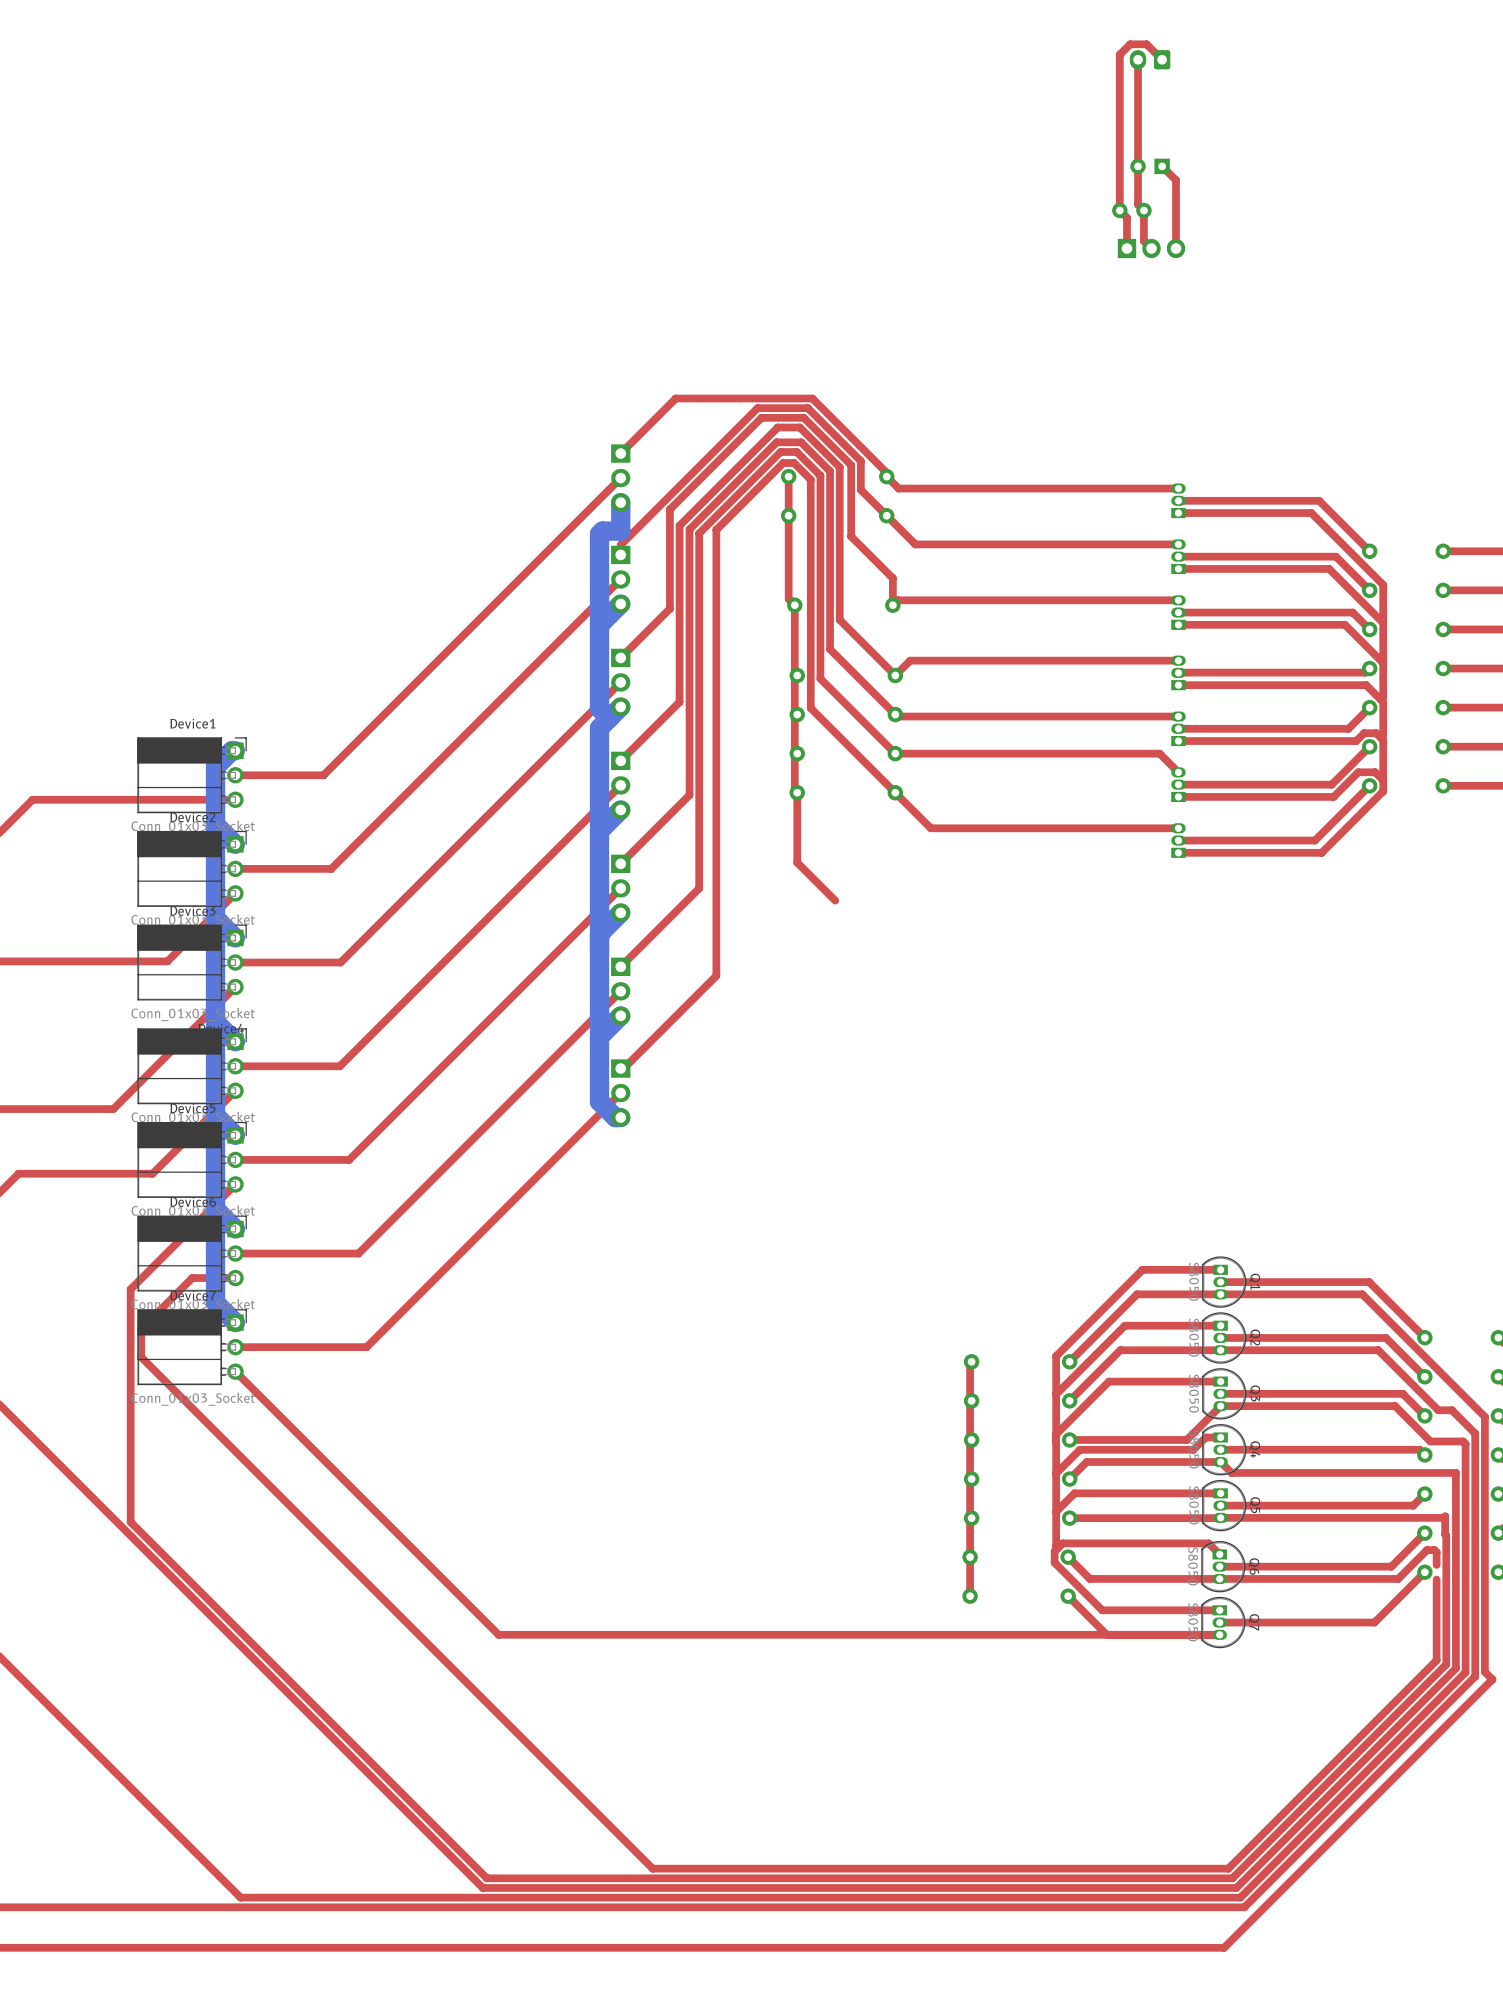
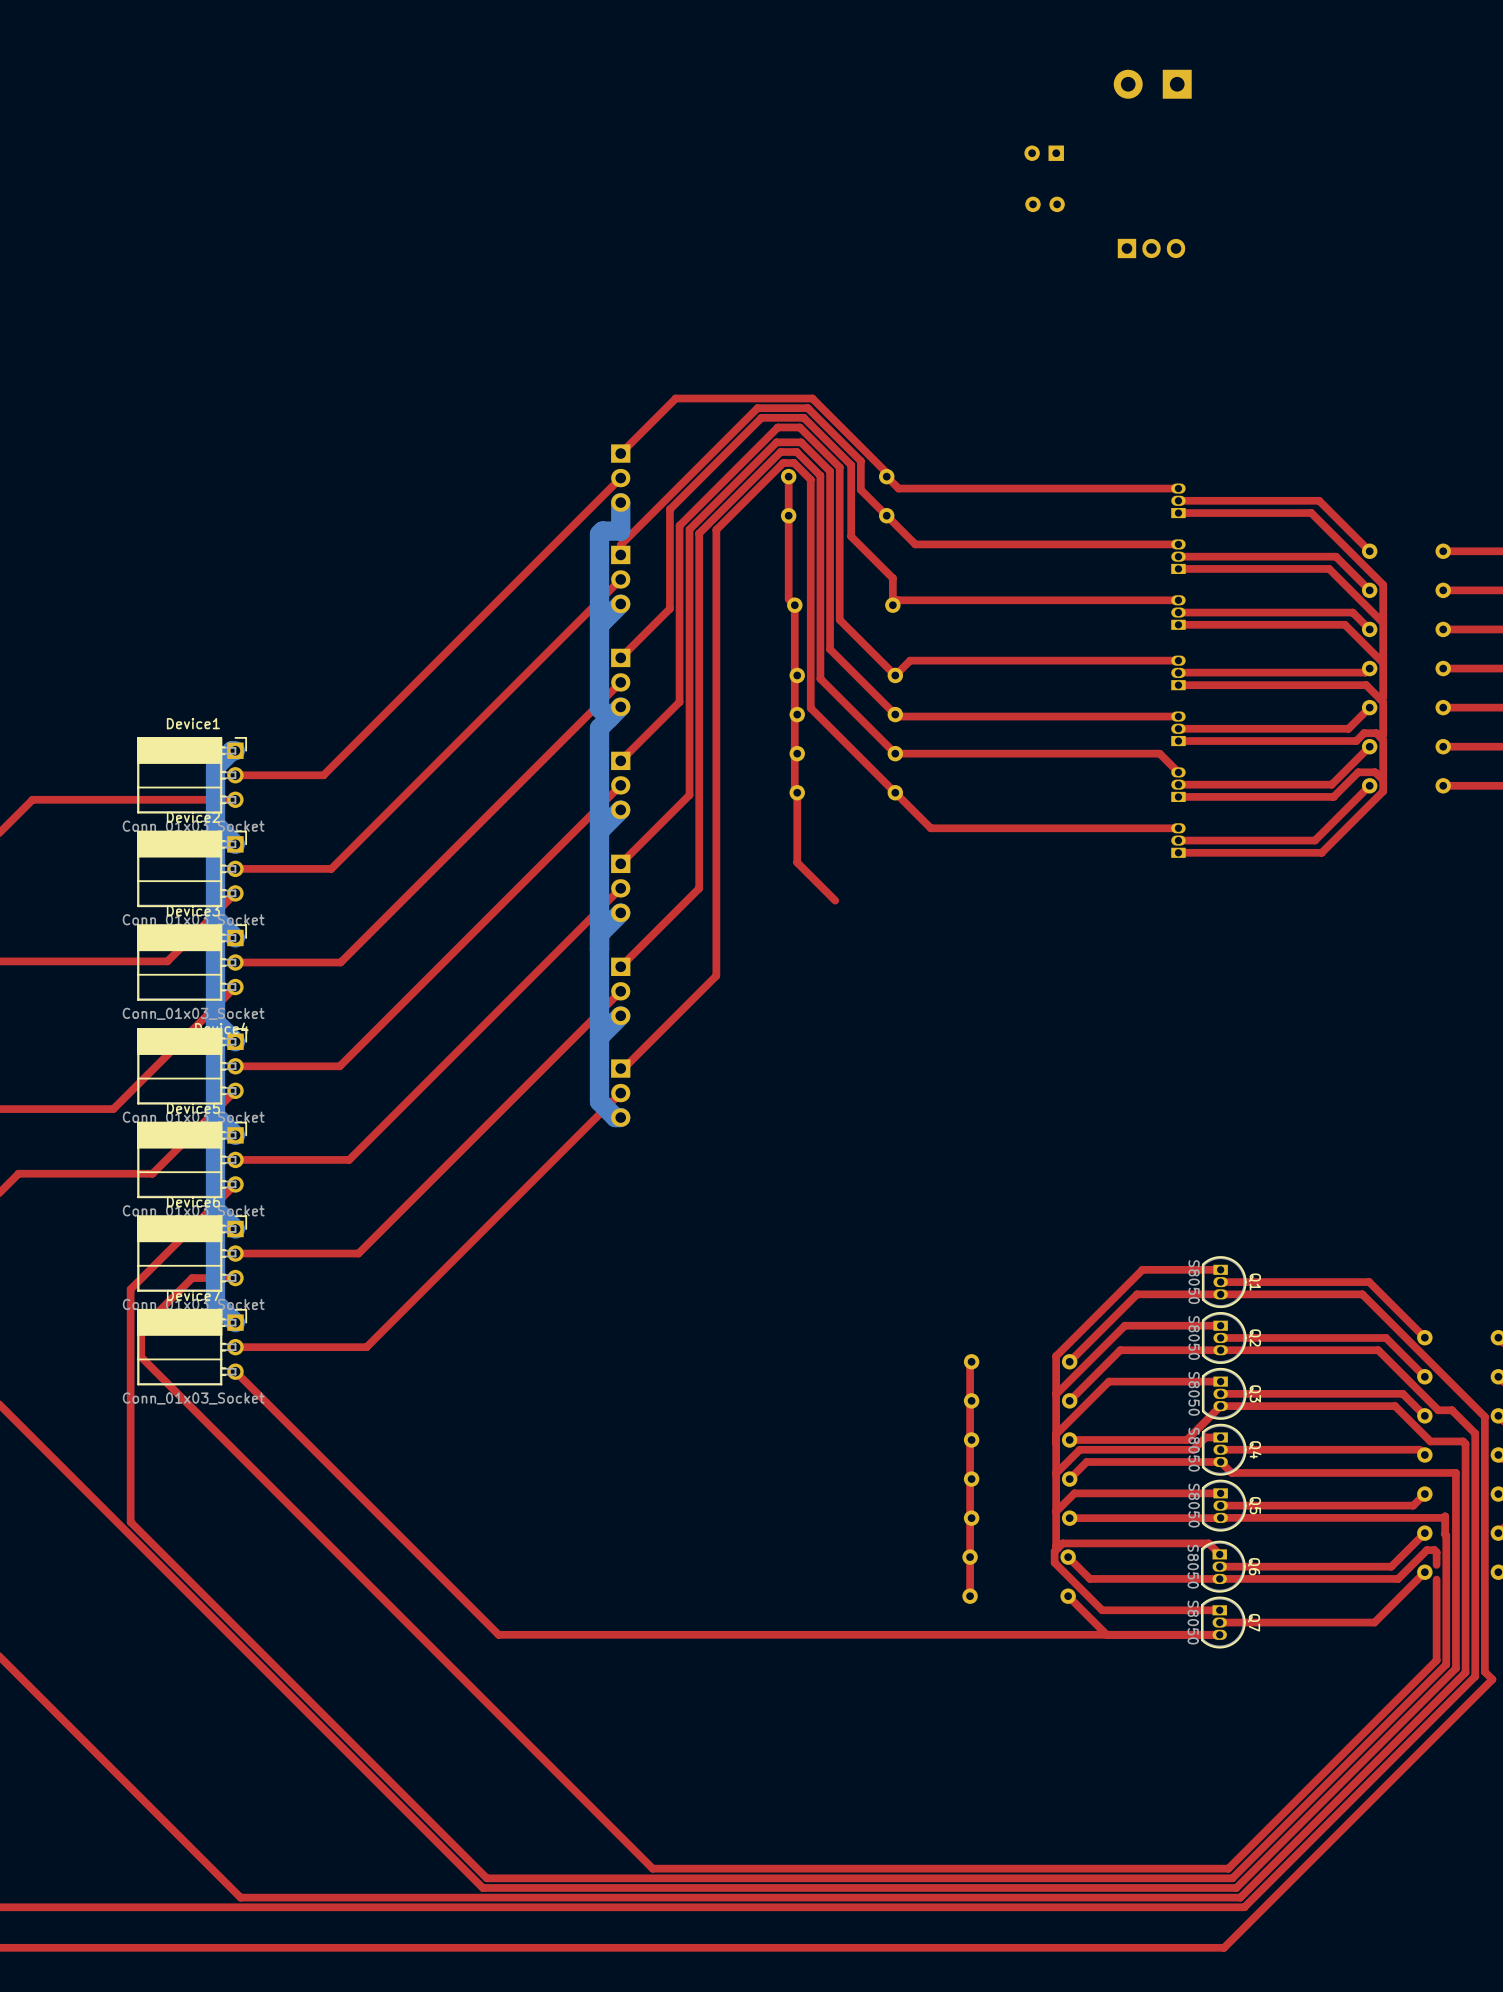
top track: (1138, 59) (1138, 204) (1143, 210) (1143, 240) (1151, 248) -> none
part: (1150, 59) -> none
top track: (1162, 59) (1146, 44) (1130, 44) (1119, 54) (1119, 210) (1126, 217) (1126, 248) -> none
part: none -> (1152, 84)
part position: (1150, 166) -> (1044, 153)
top track: (1162, 166) (1176, 180) (1176, 248) -> none
part position: (1131, 210) -> (1045, 204)

